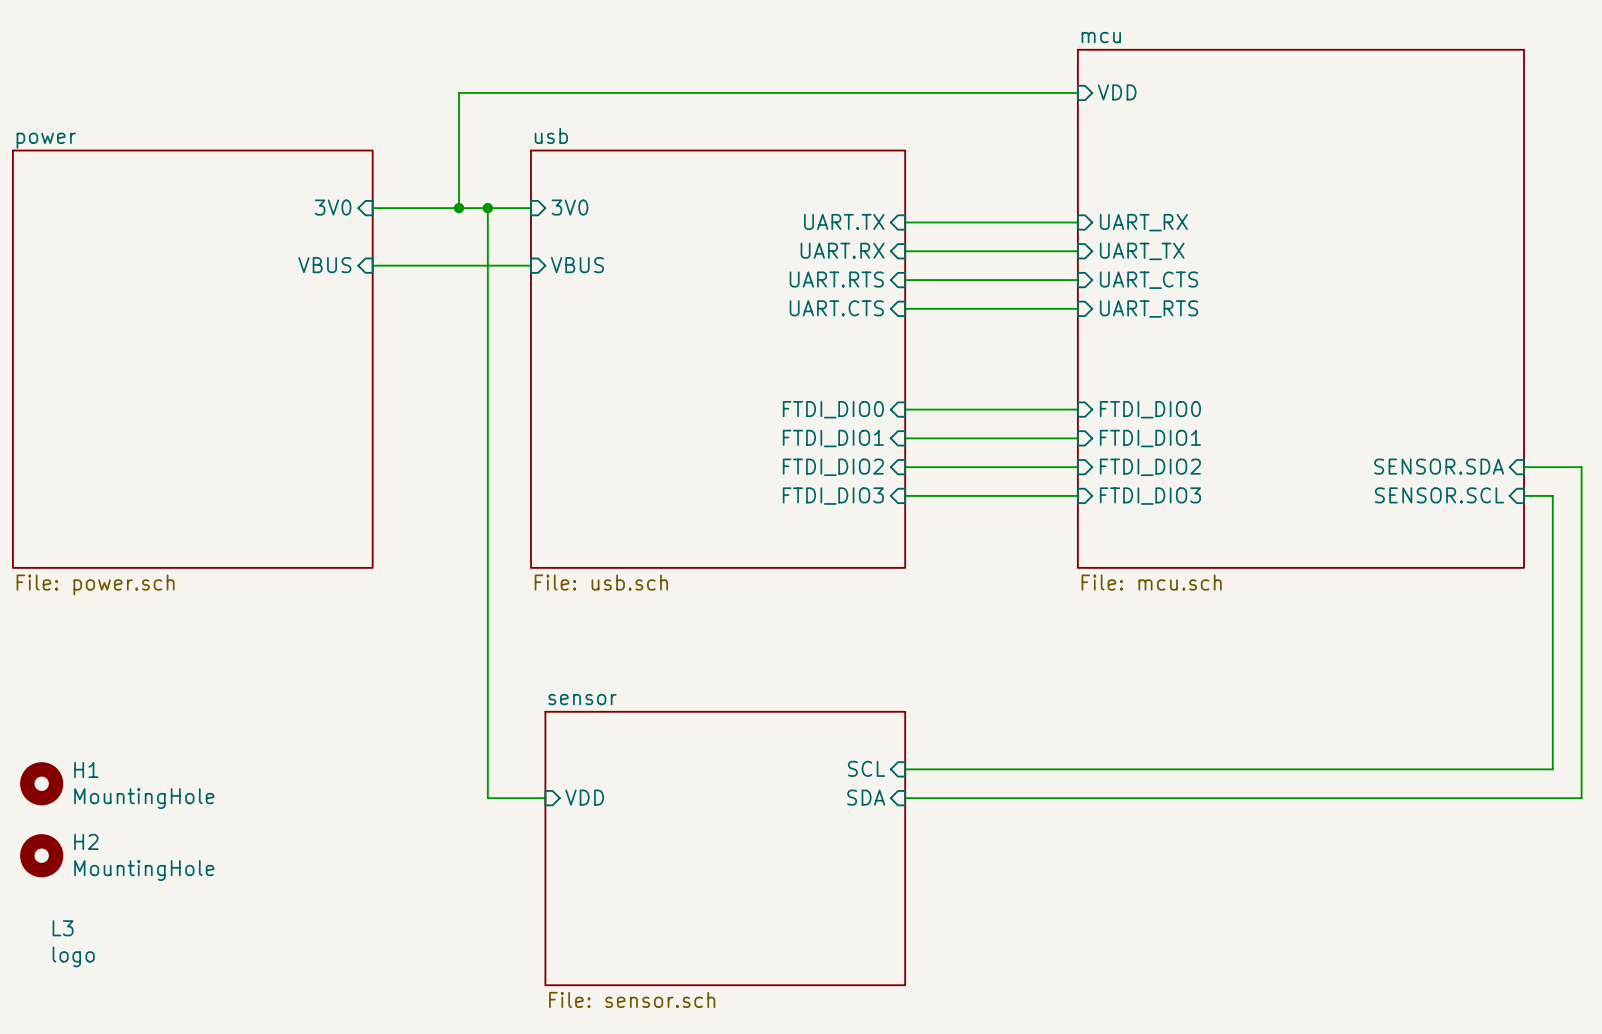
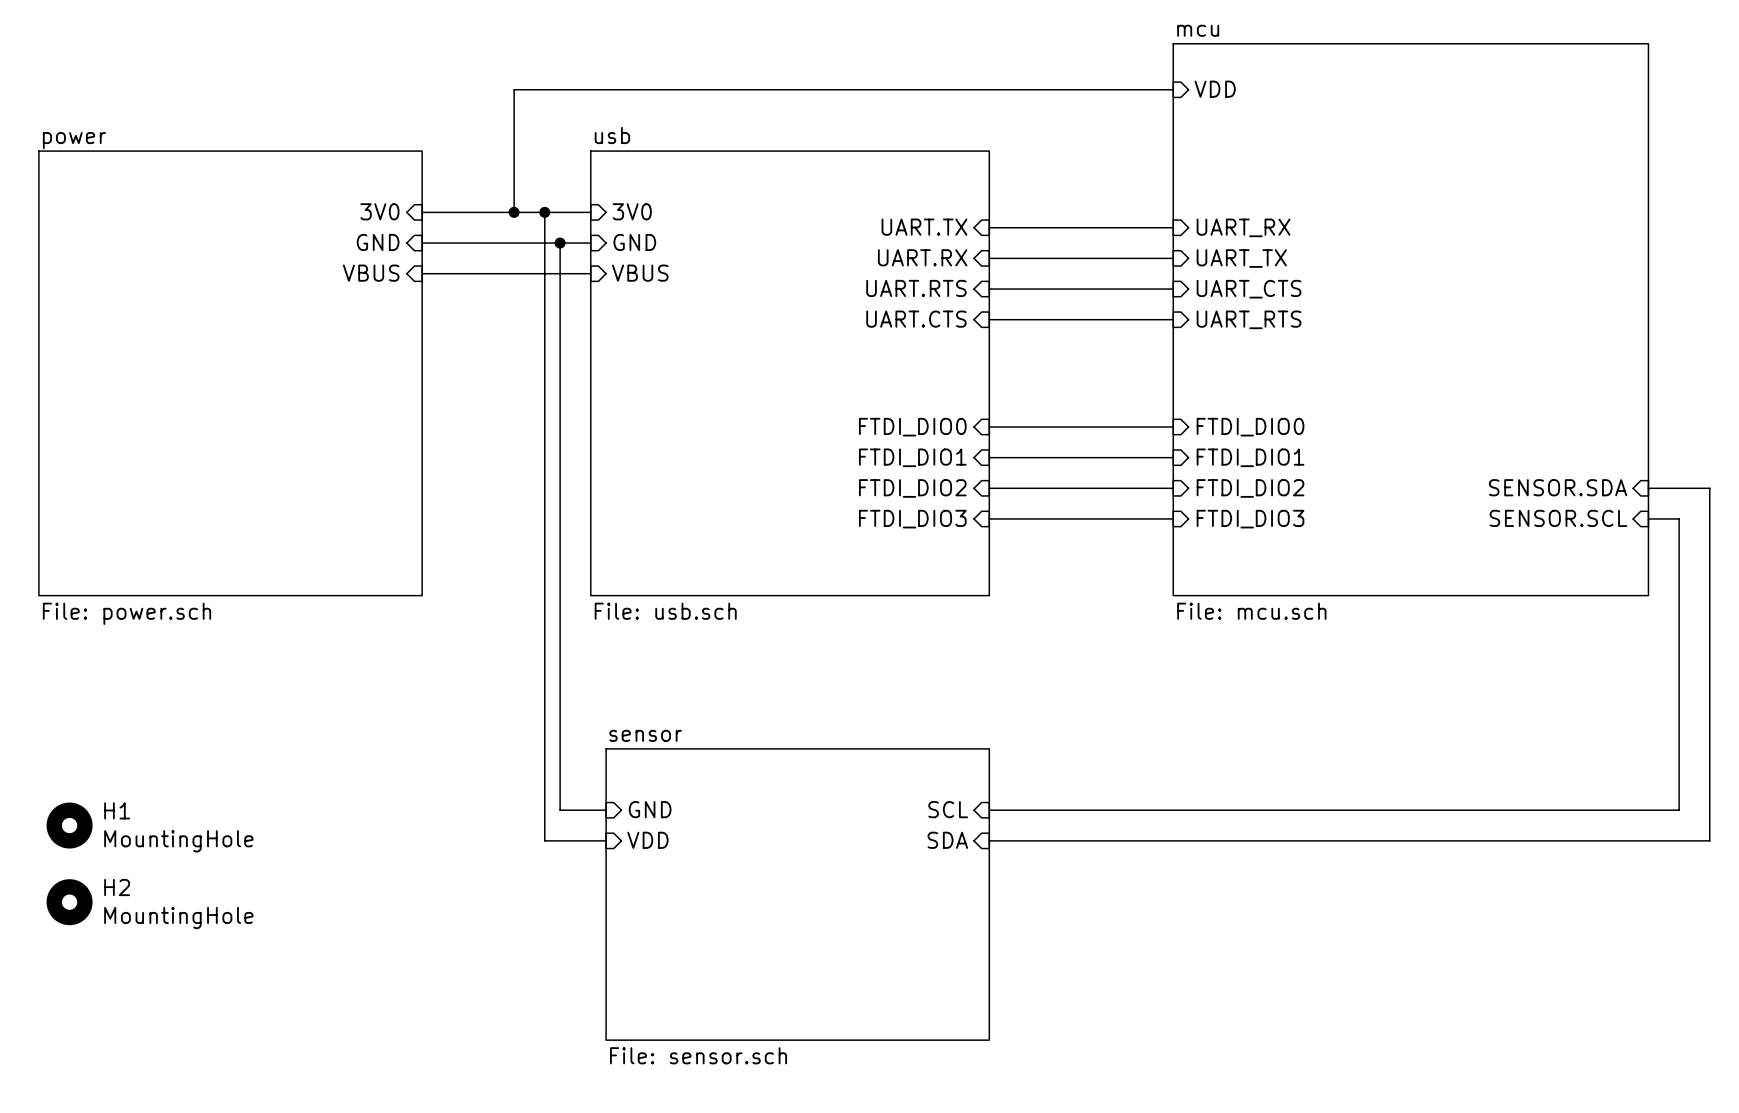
sheet pin: none -> GND (378, 242)
wire: none -> (422, 243) (590, 243)
wire: none -> (560, 243) (560, 810) (606, 810)
junction: none -> (560, 243)
sheet pin: none -> GND (634, 242)
sheet pin: none -> GND (650, 809)
L3: logo (73, 943) -> none

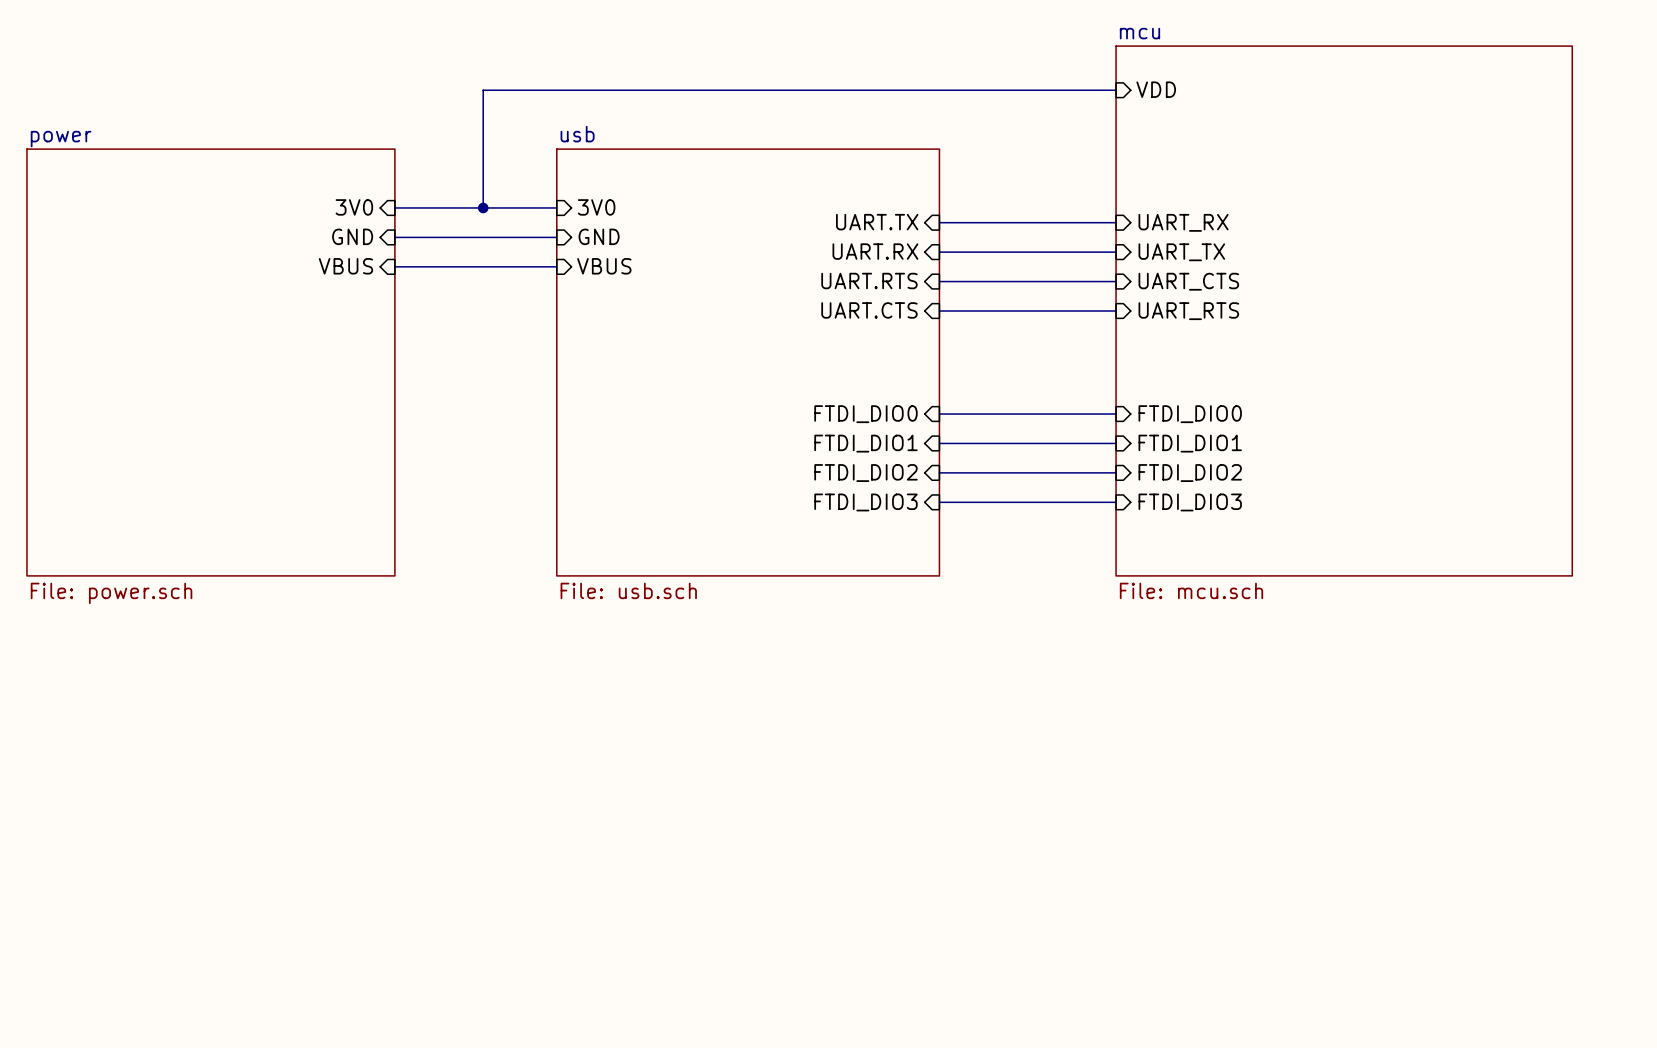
wire: (544, 212) (544, 840) (606, 840) -> none
junction: (544, 212) -> none
wire: (560, 243) (560, 810) (606, 810) -> none
junction: (560, 243) -> none
sheet pin: SENSOR.SDA (1558, 487) -> none
wire: (1648, 488) (1709, 488) (1709, 840) (989, 840) -> none
sheet pin: SENSOR.SCL (1558, 518) -> none
wire: (1648, 518) (1679, 518) (1679, 810) (989, 810) -> none
sheet pin: GND (650, 809) -> none
sheet pin: SCL (948, 809) -> none
H1: MountingHole (69, 825) -> none
sheet pin: VDD (647, 840) -> none
sheet pin: SDA (947, 840) -> none
sheet sensor: File: sensor.sch (797, 894) -> none
H2: MountingHole (69, 902) -> none

